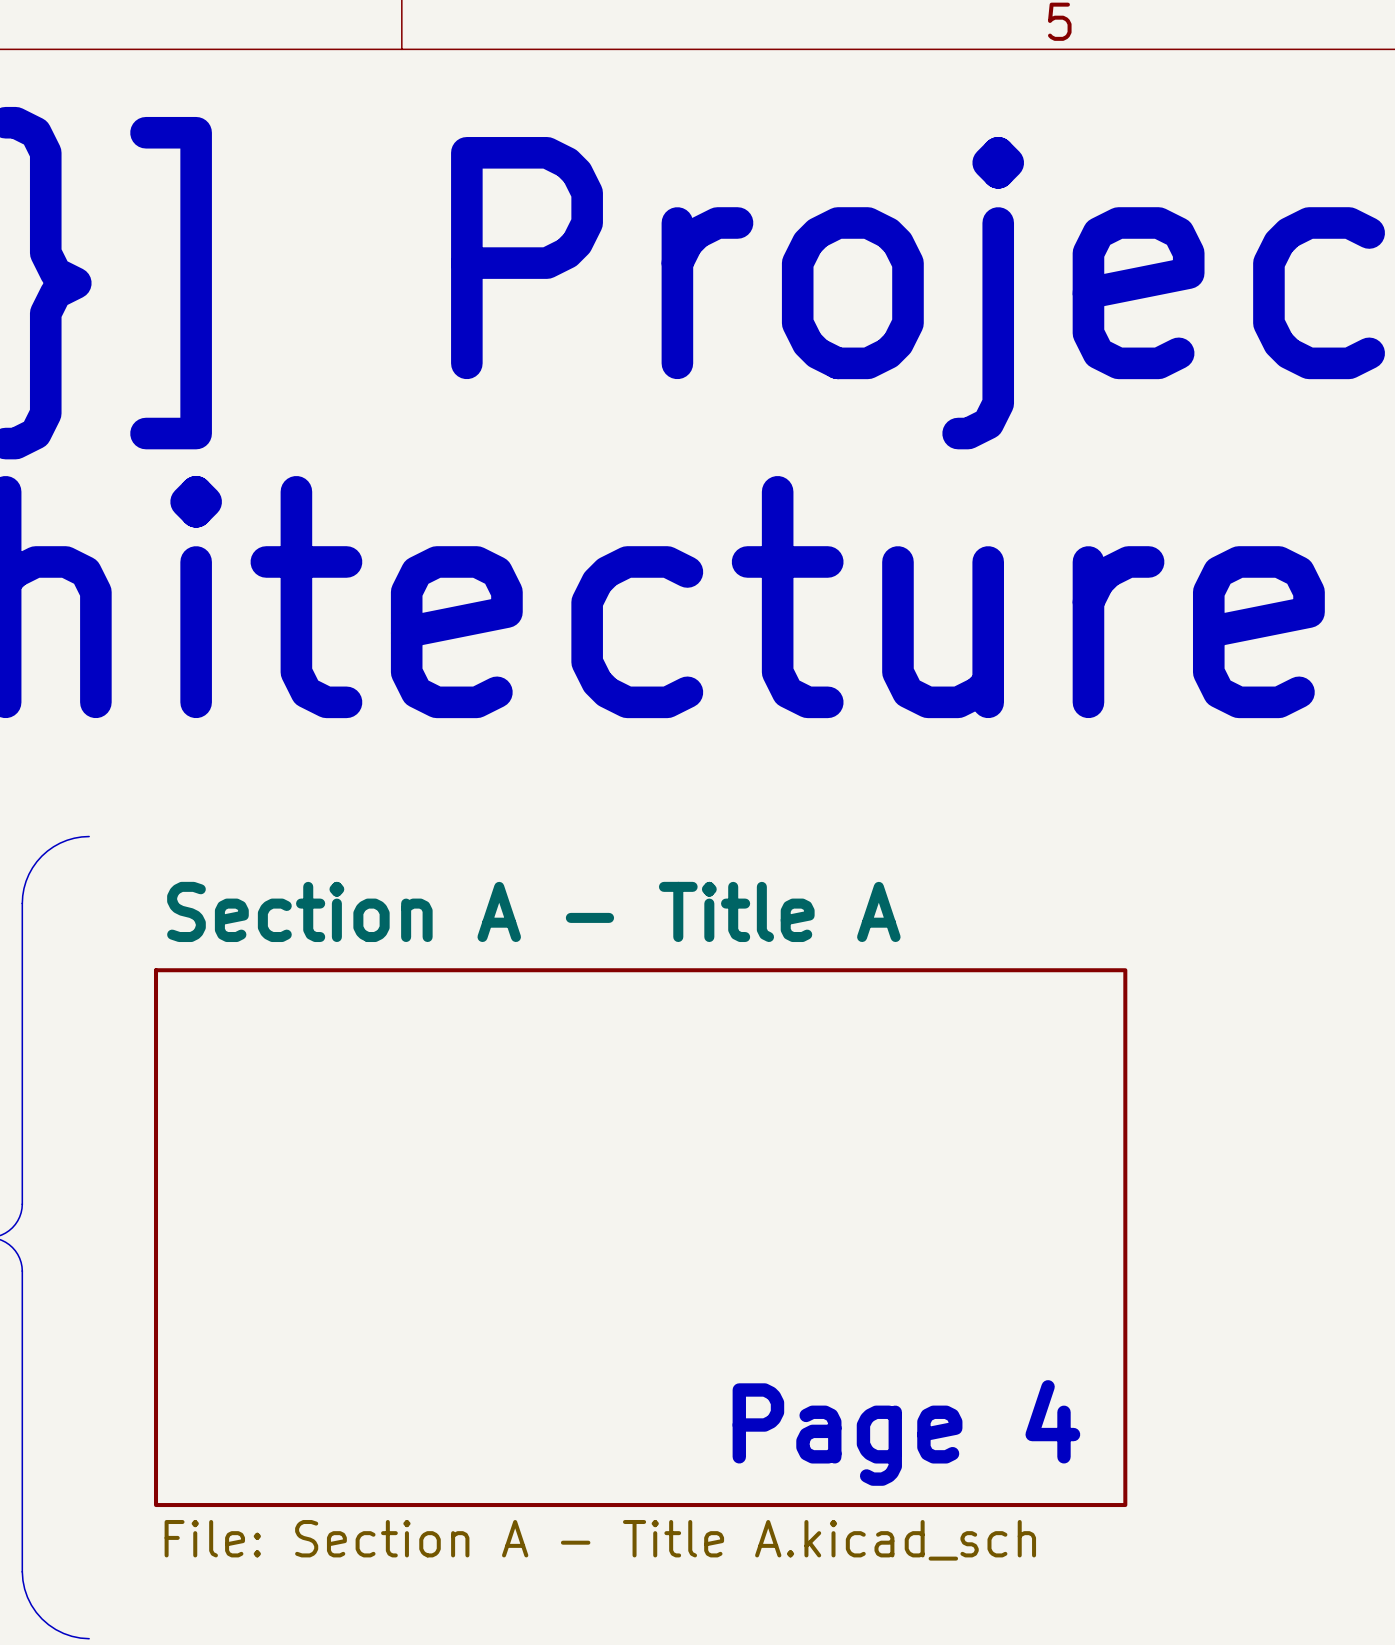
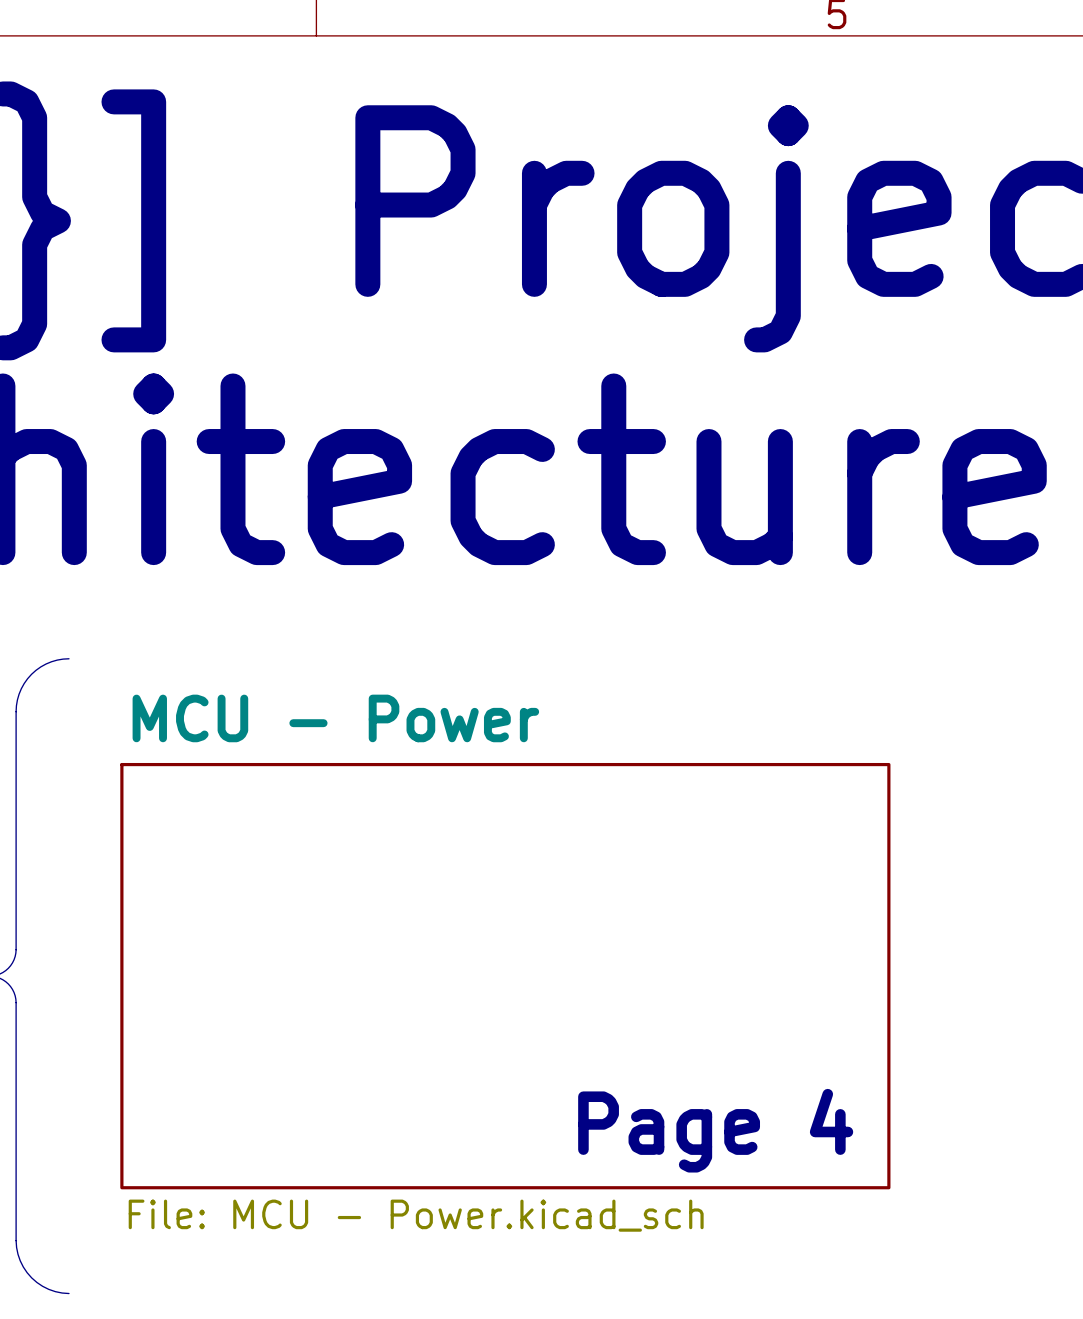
sheet Section A - Title A name: Section A - Title A (533, 911) -> MCU - Power (335, 718)
sheet Section A - Title A value: File: Section A - Title A.kicad_sch (600, 1540) -> File: MCU - Power.kicad_sch (416, 1215)

